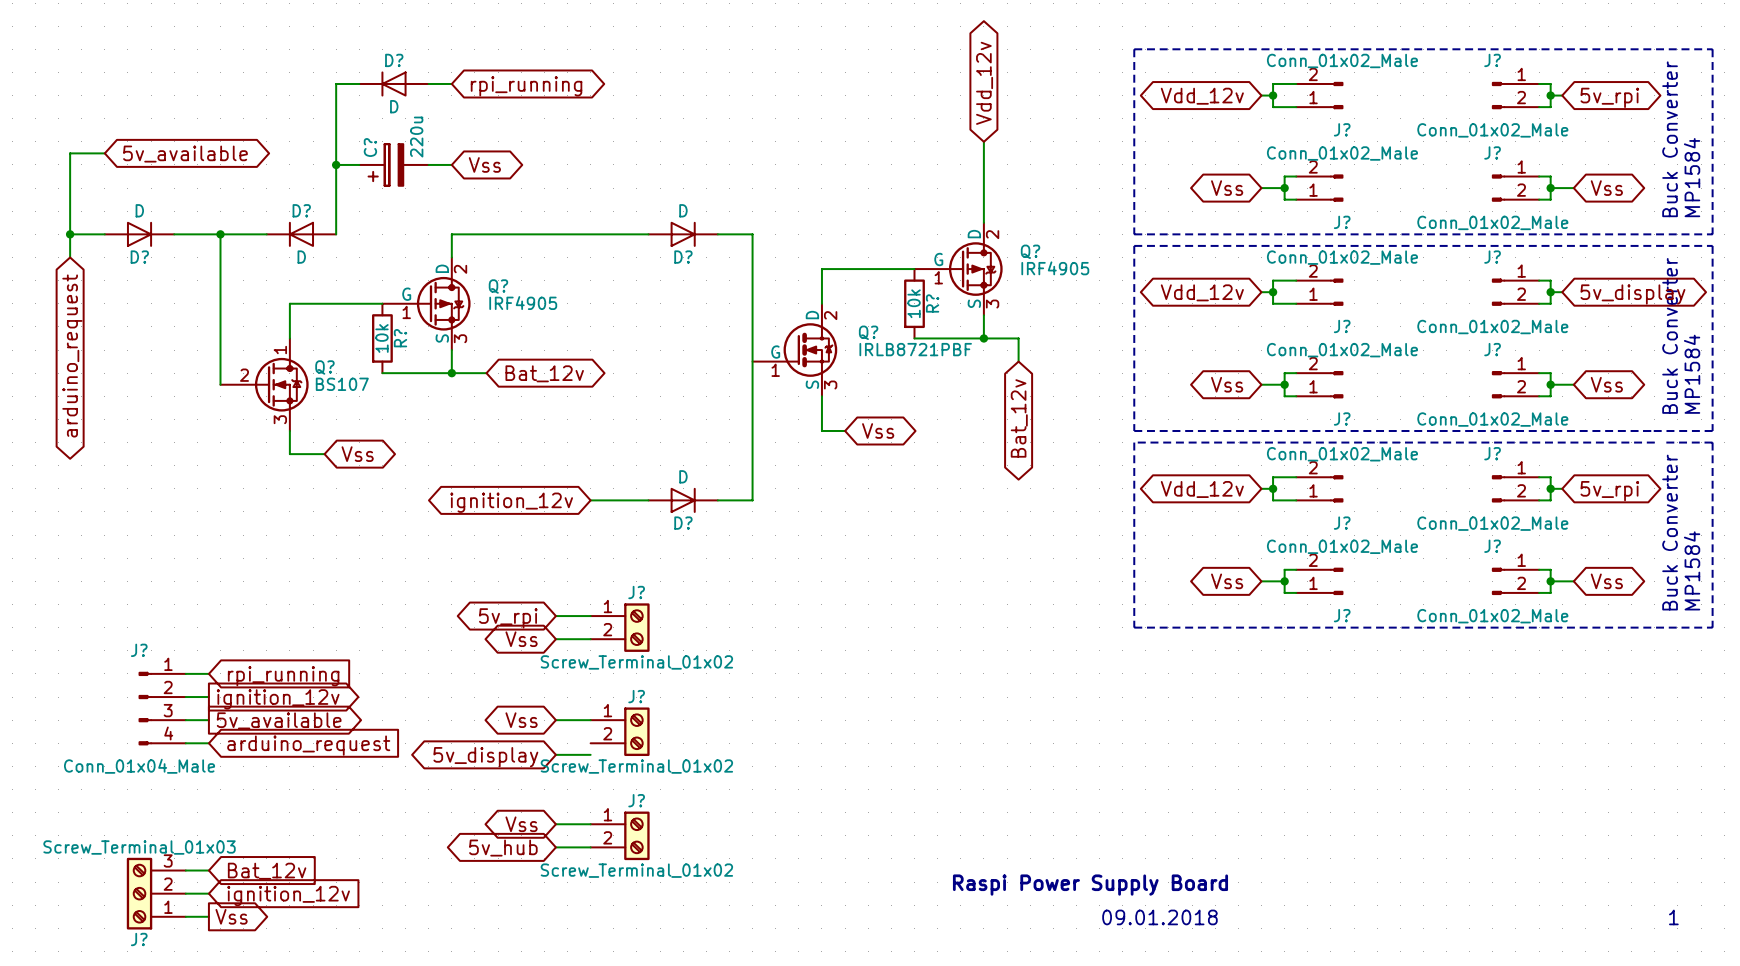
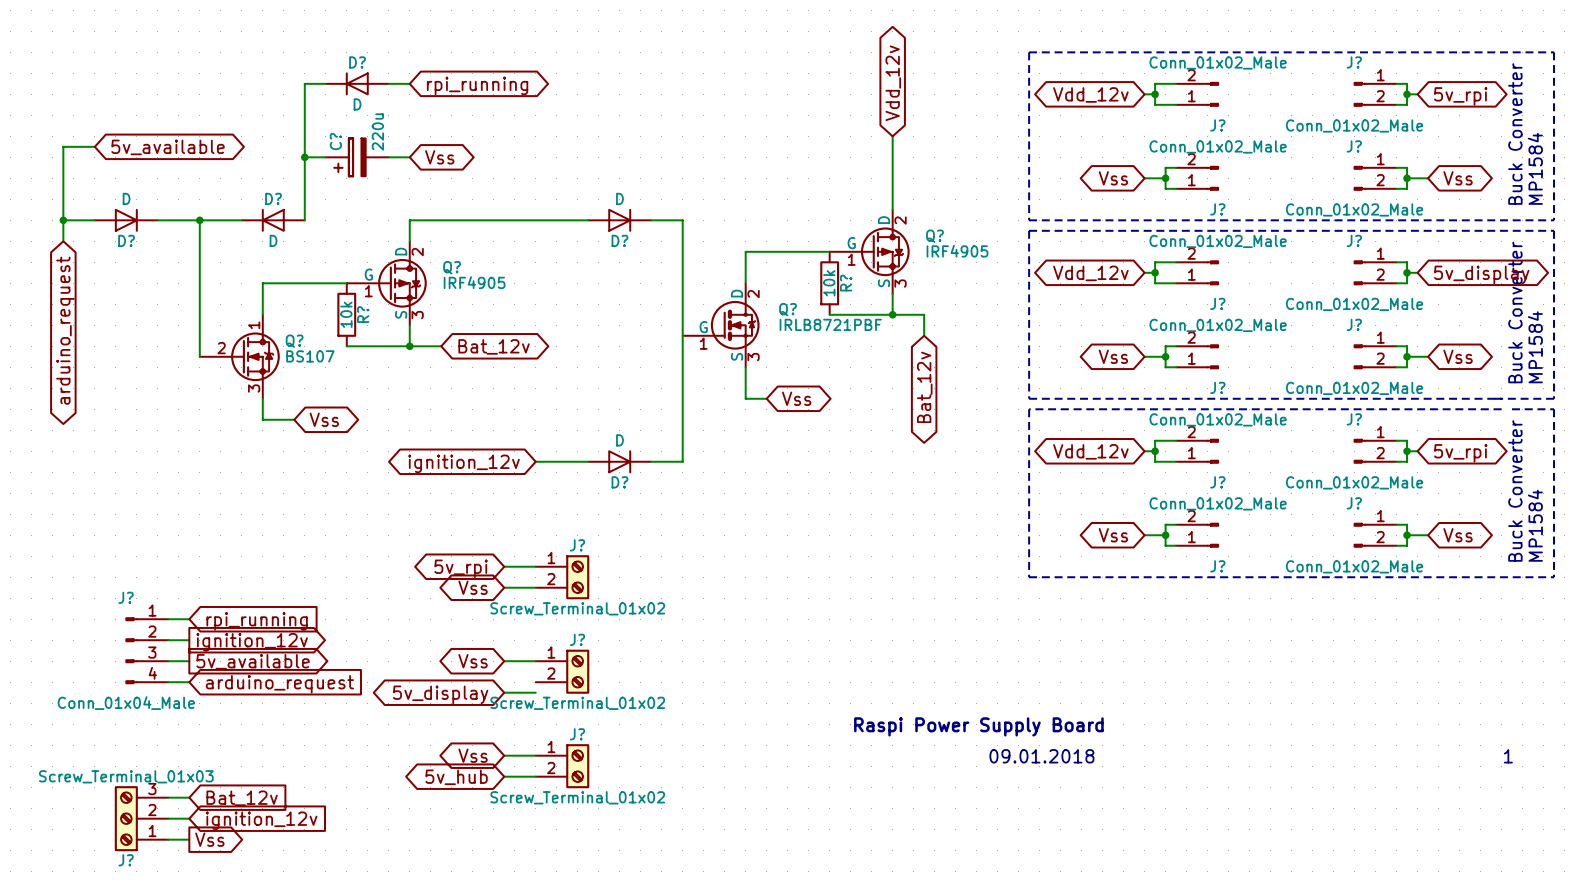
text position: Raspi Power Supply Board (1090, 885) -> Raspi Power Supply Board (978, 726)
text position: 09.01.2018 (1159, 917) -> 09.01.2018 (1041, 756)
text position: 1 (1673, 917) -> 1 (1508, 756)

